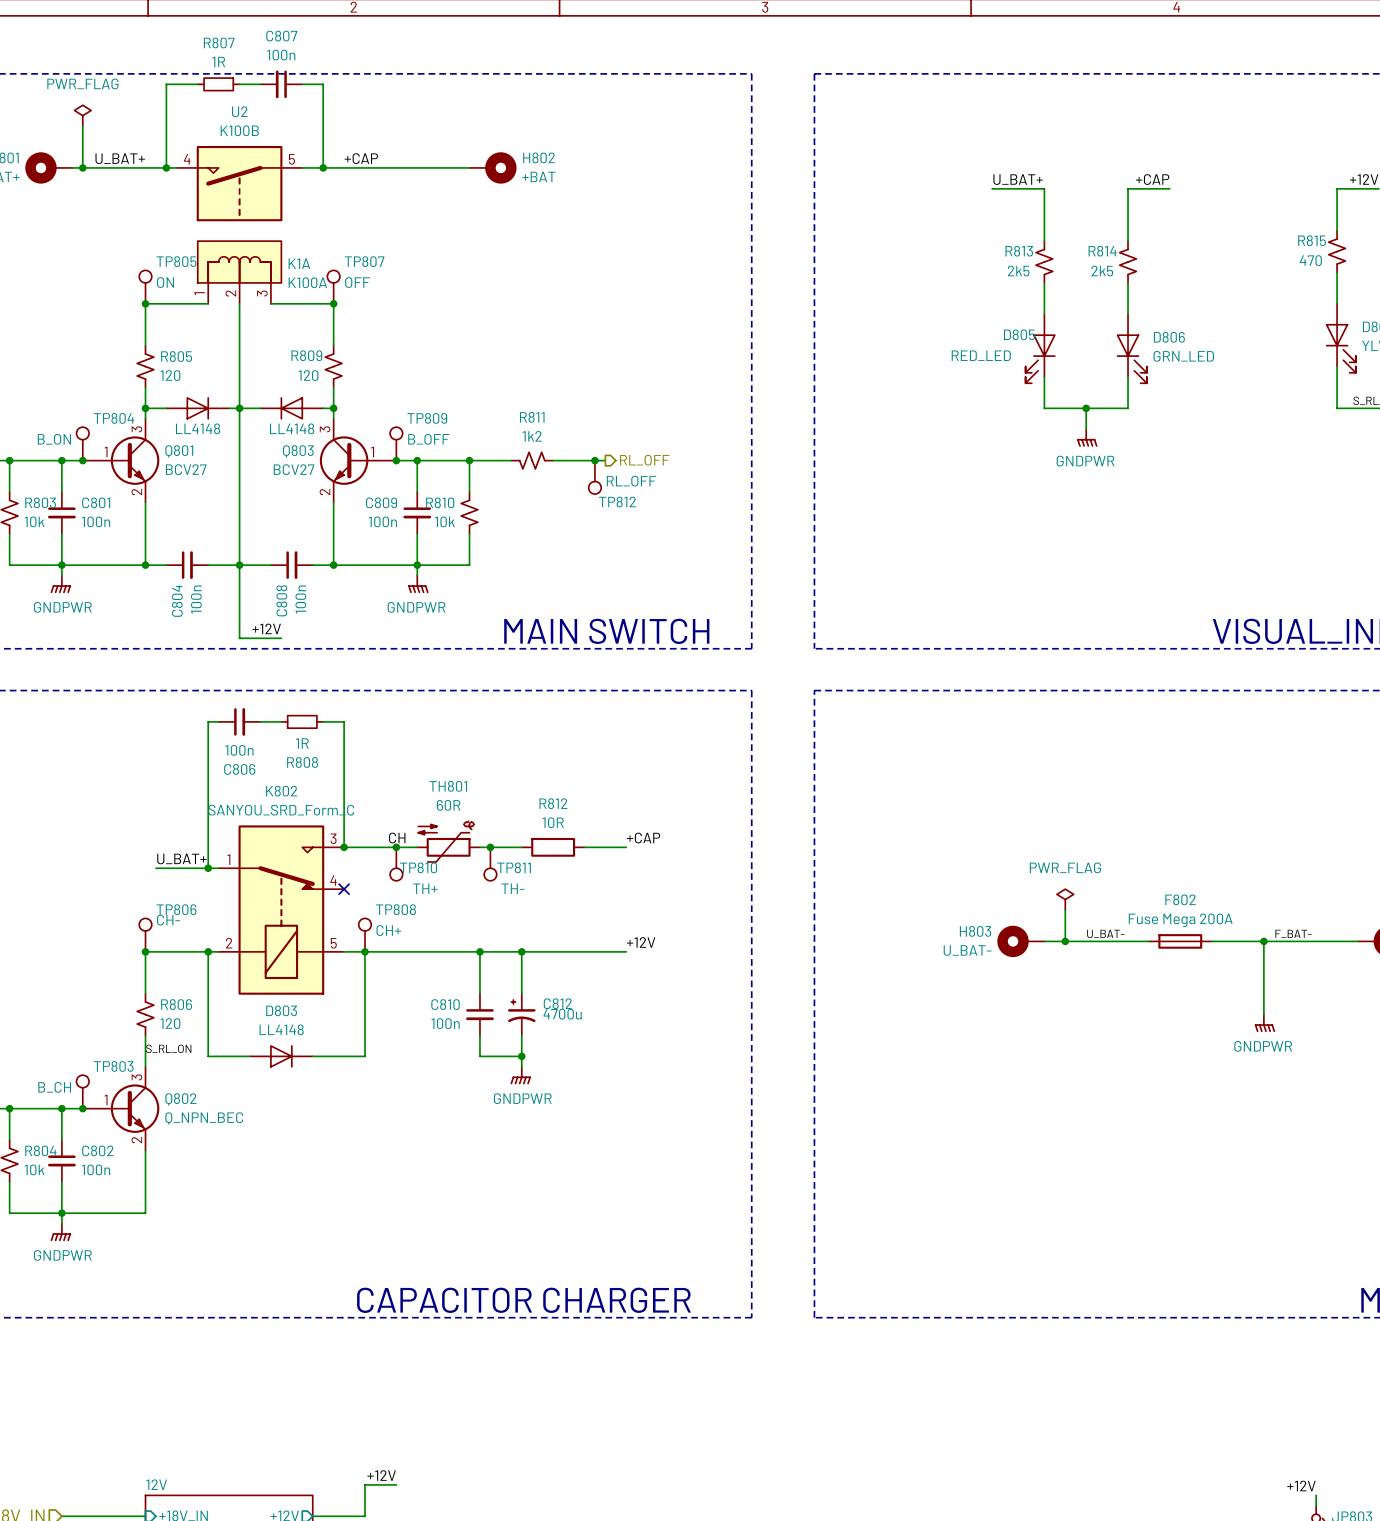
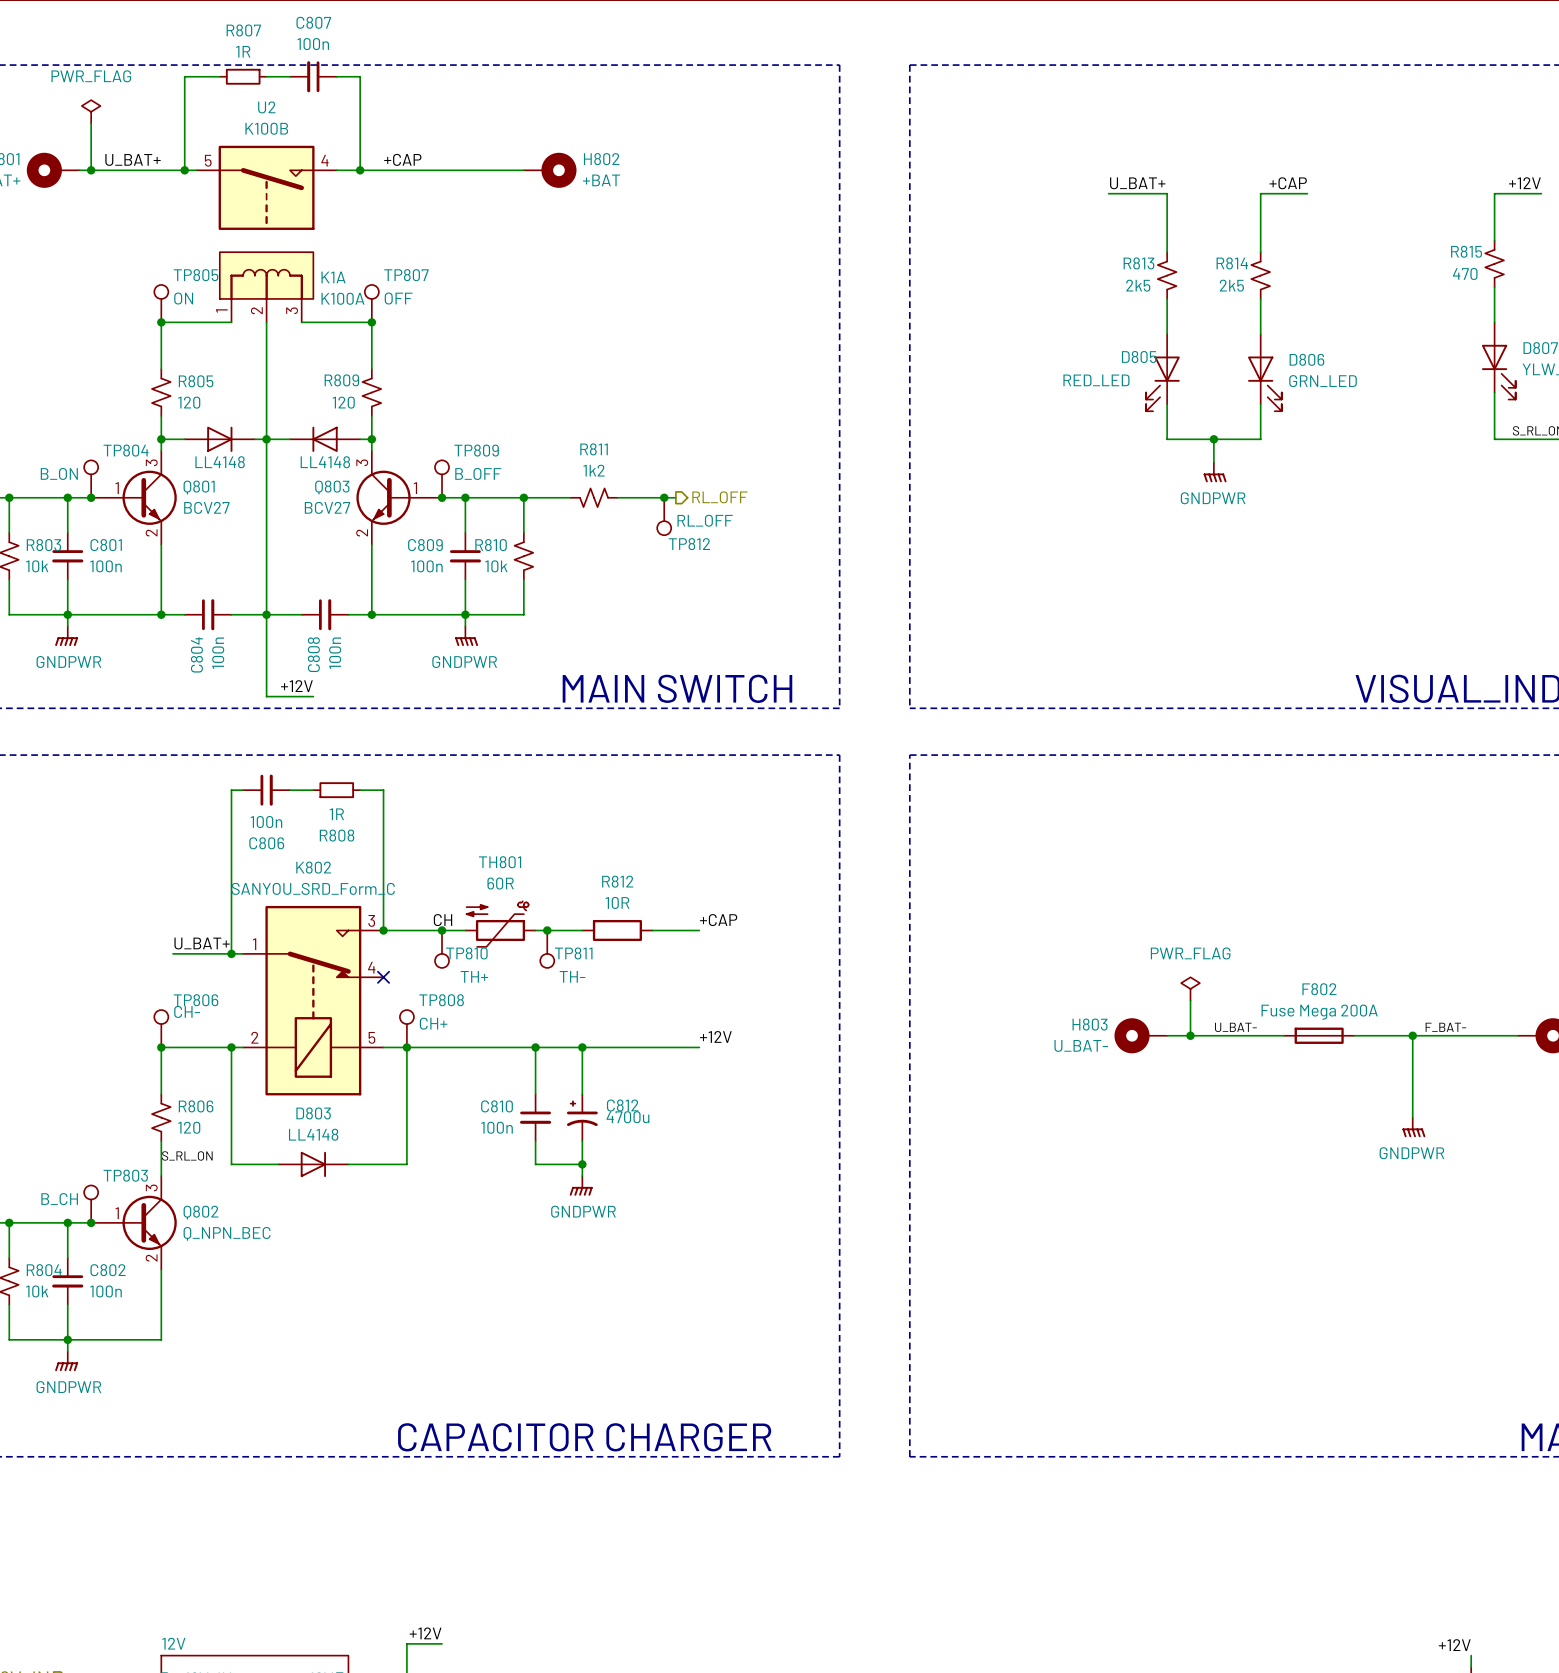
U2 flip: as is (239, 183) -> left-right (266, 187)

